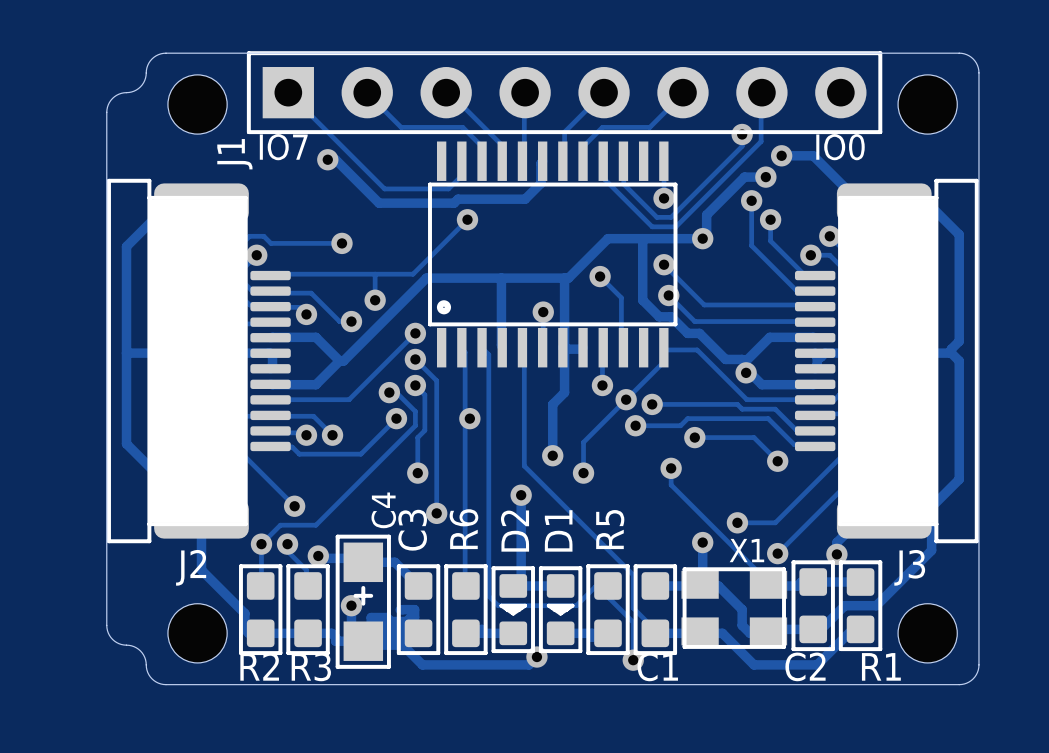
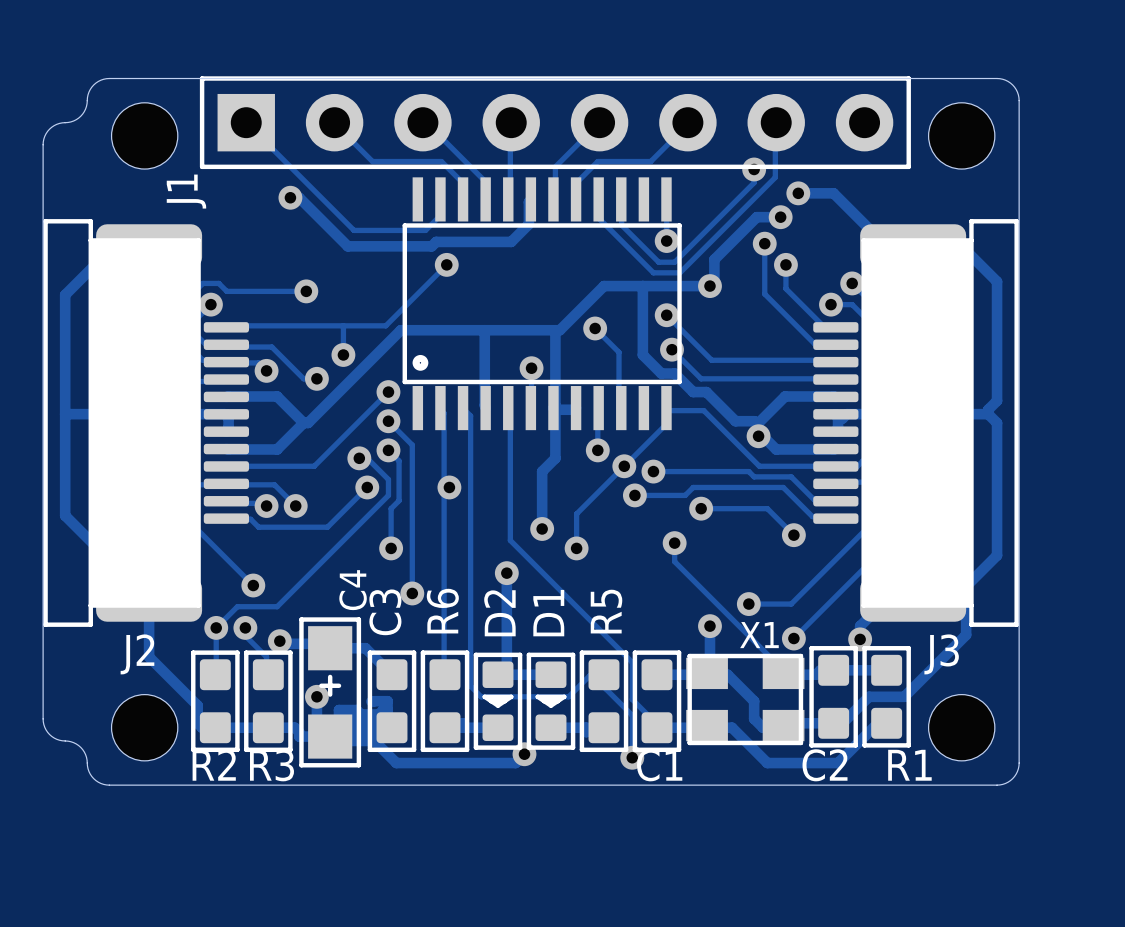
text: IO7 (283, 147) -> none
text: IO0 (840, 147) -> none

